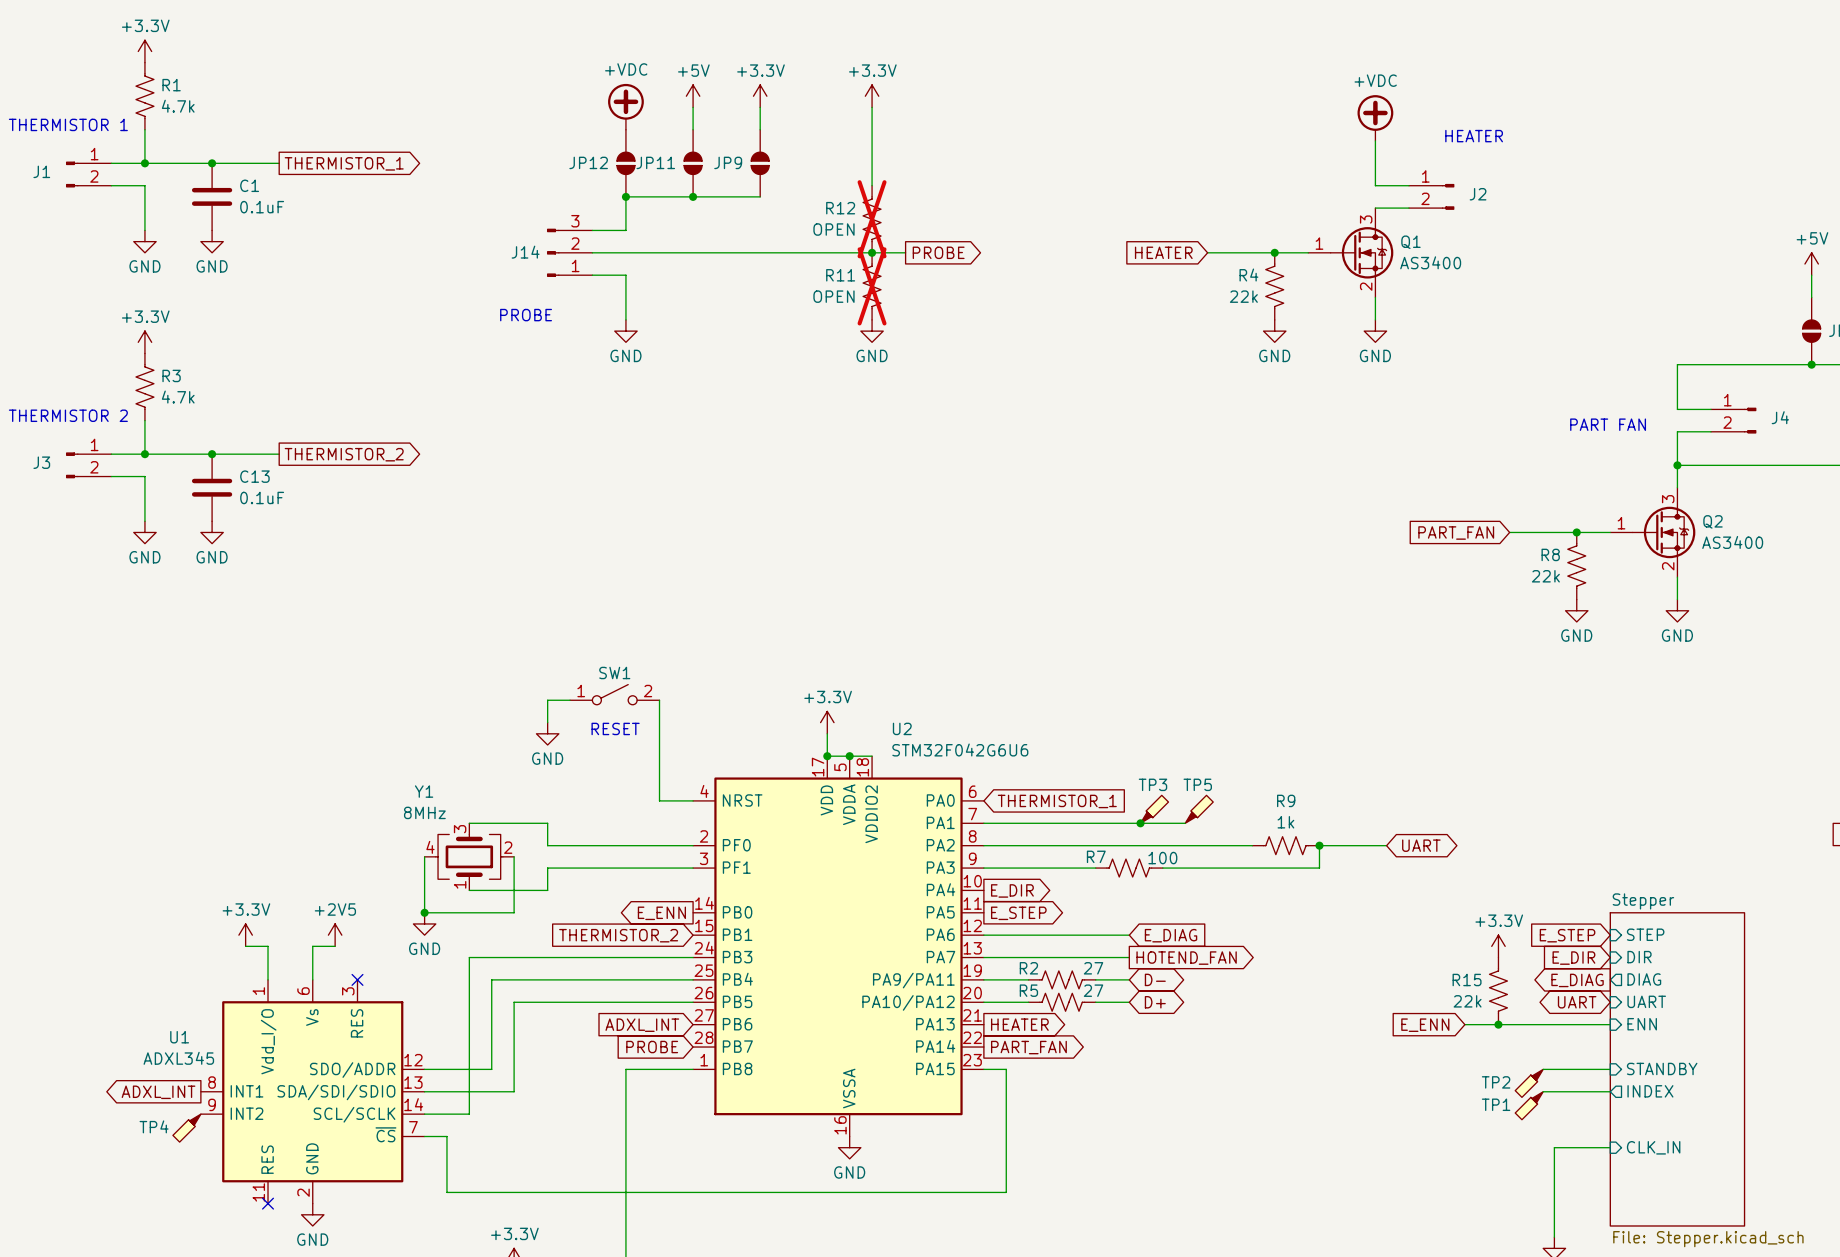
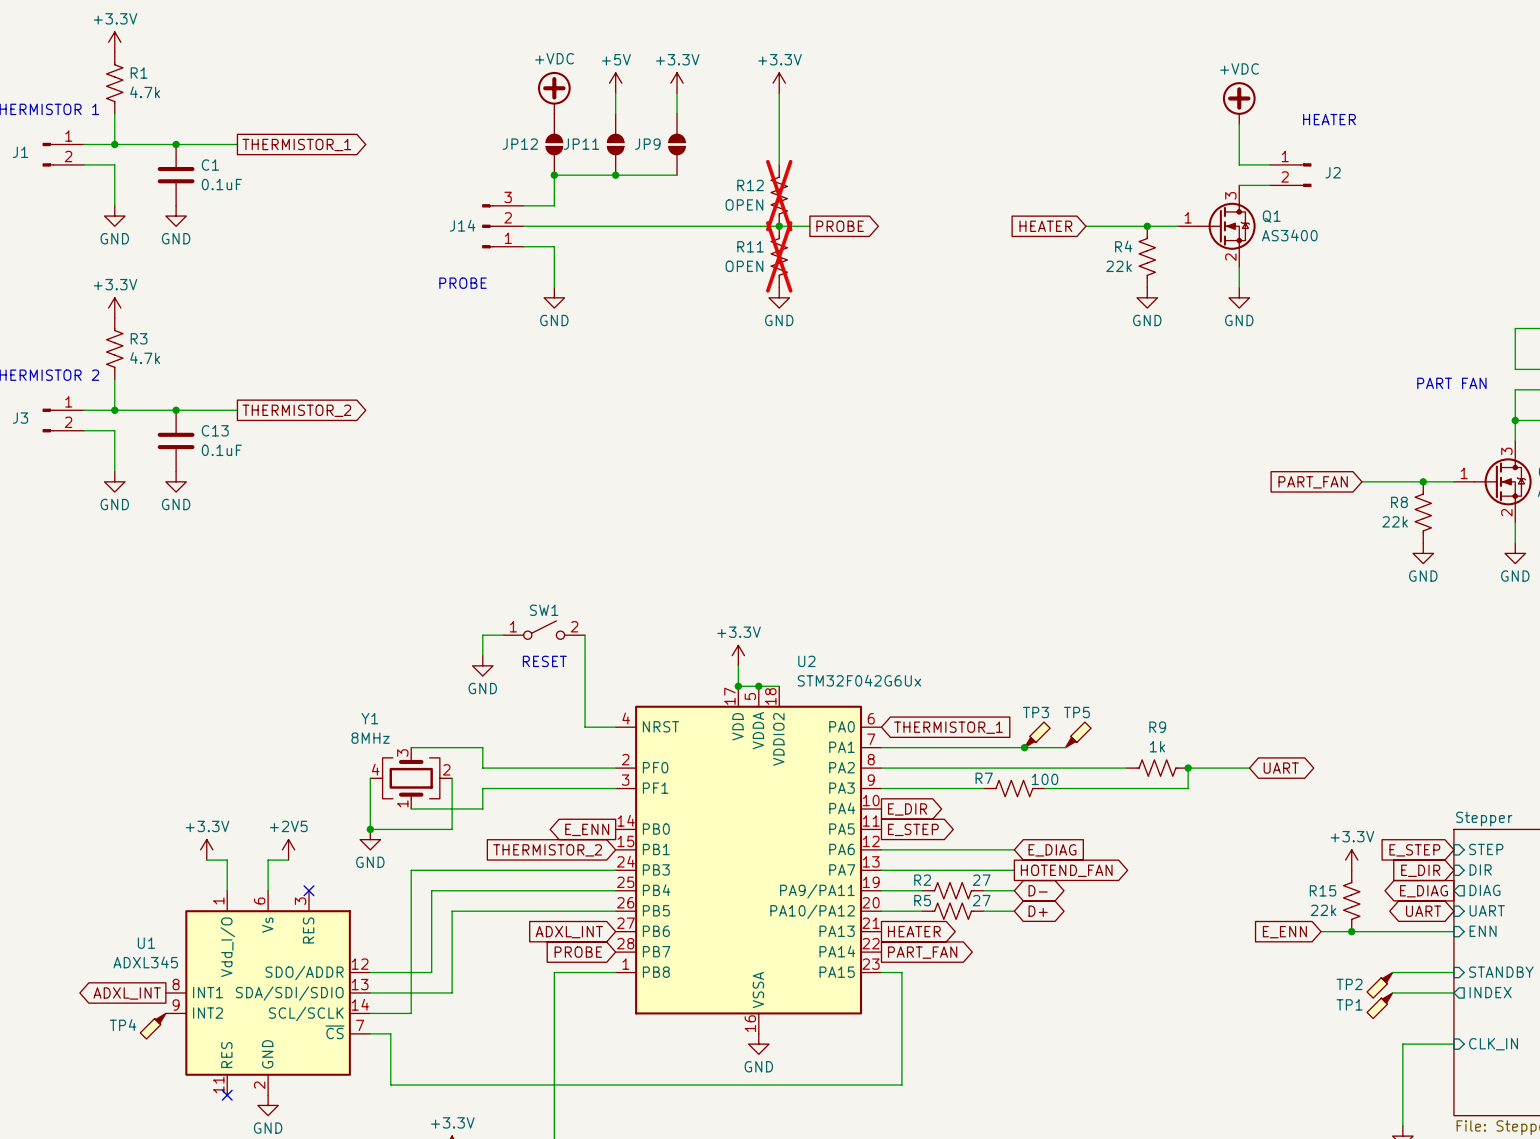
U2 value: STM32F042G6U6 (960, 750) -> STM32F042G6Ux (859, 680)

